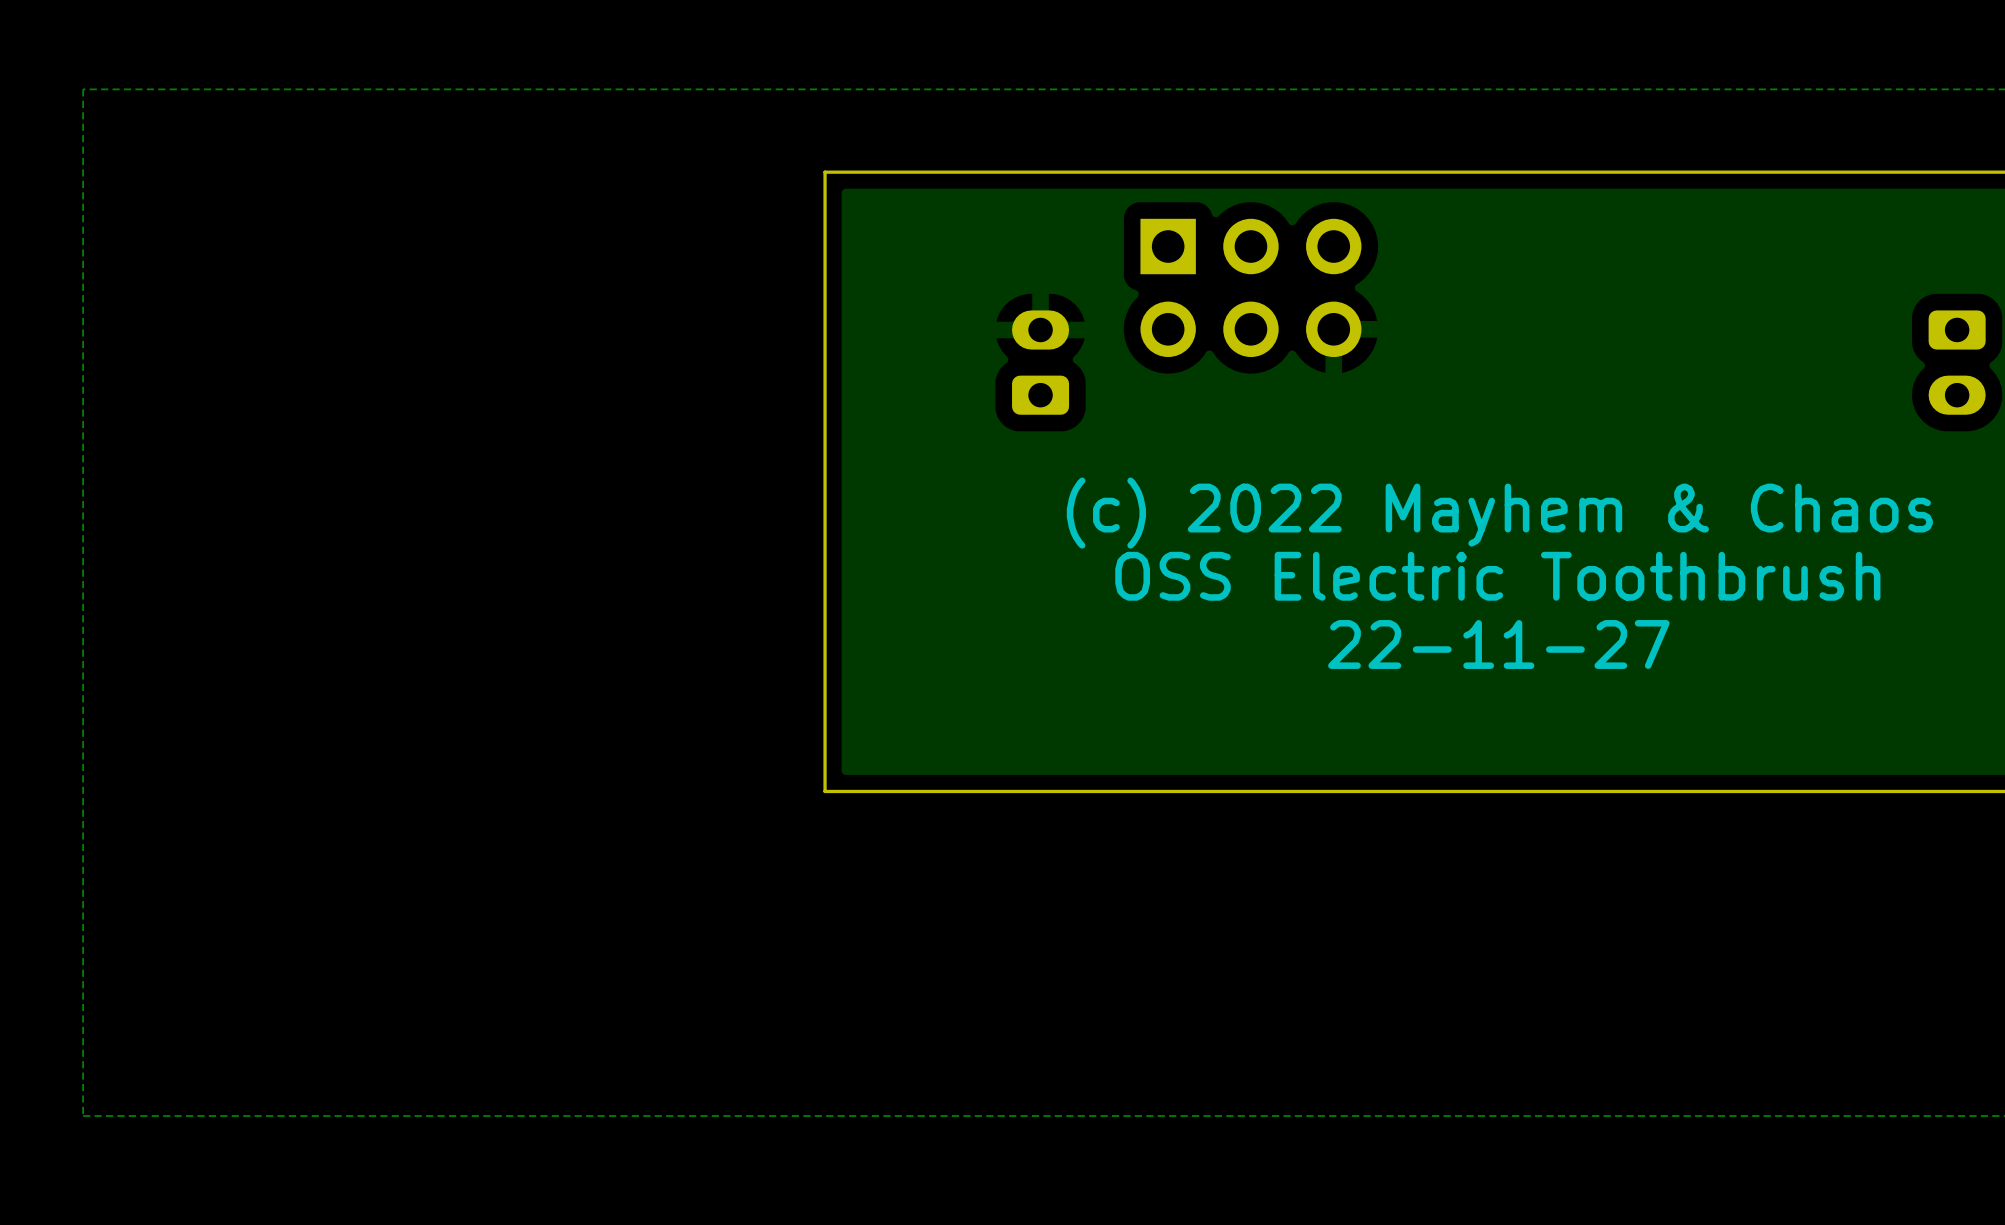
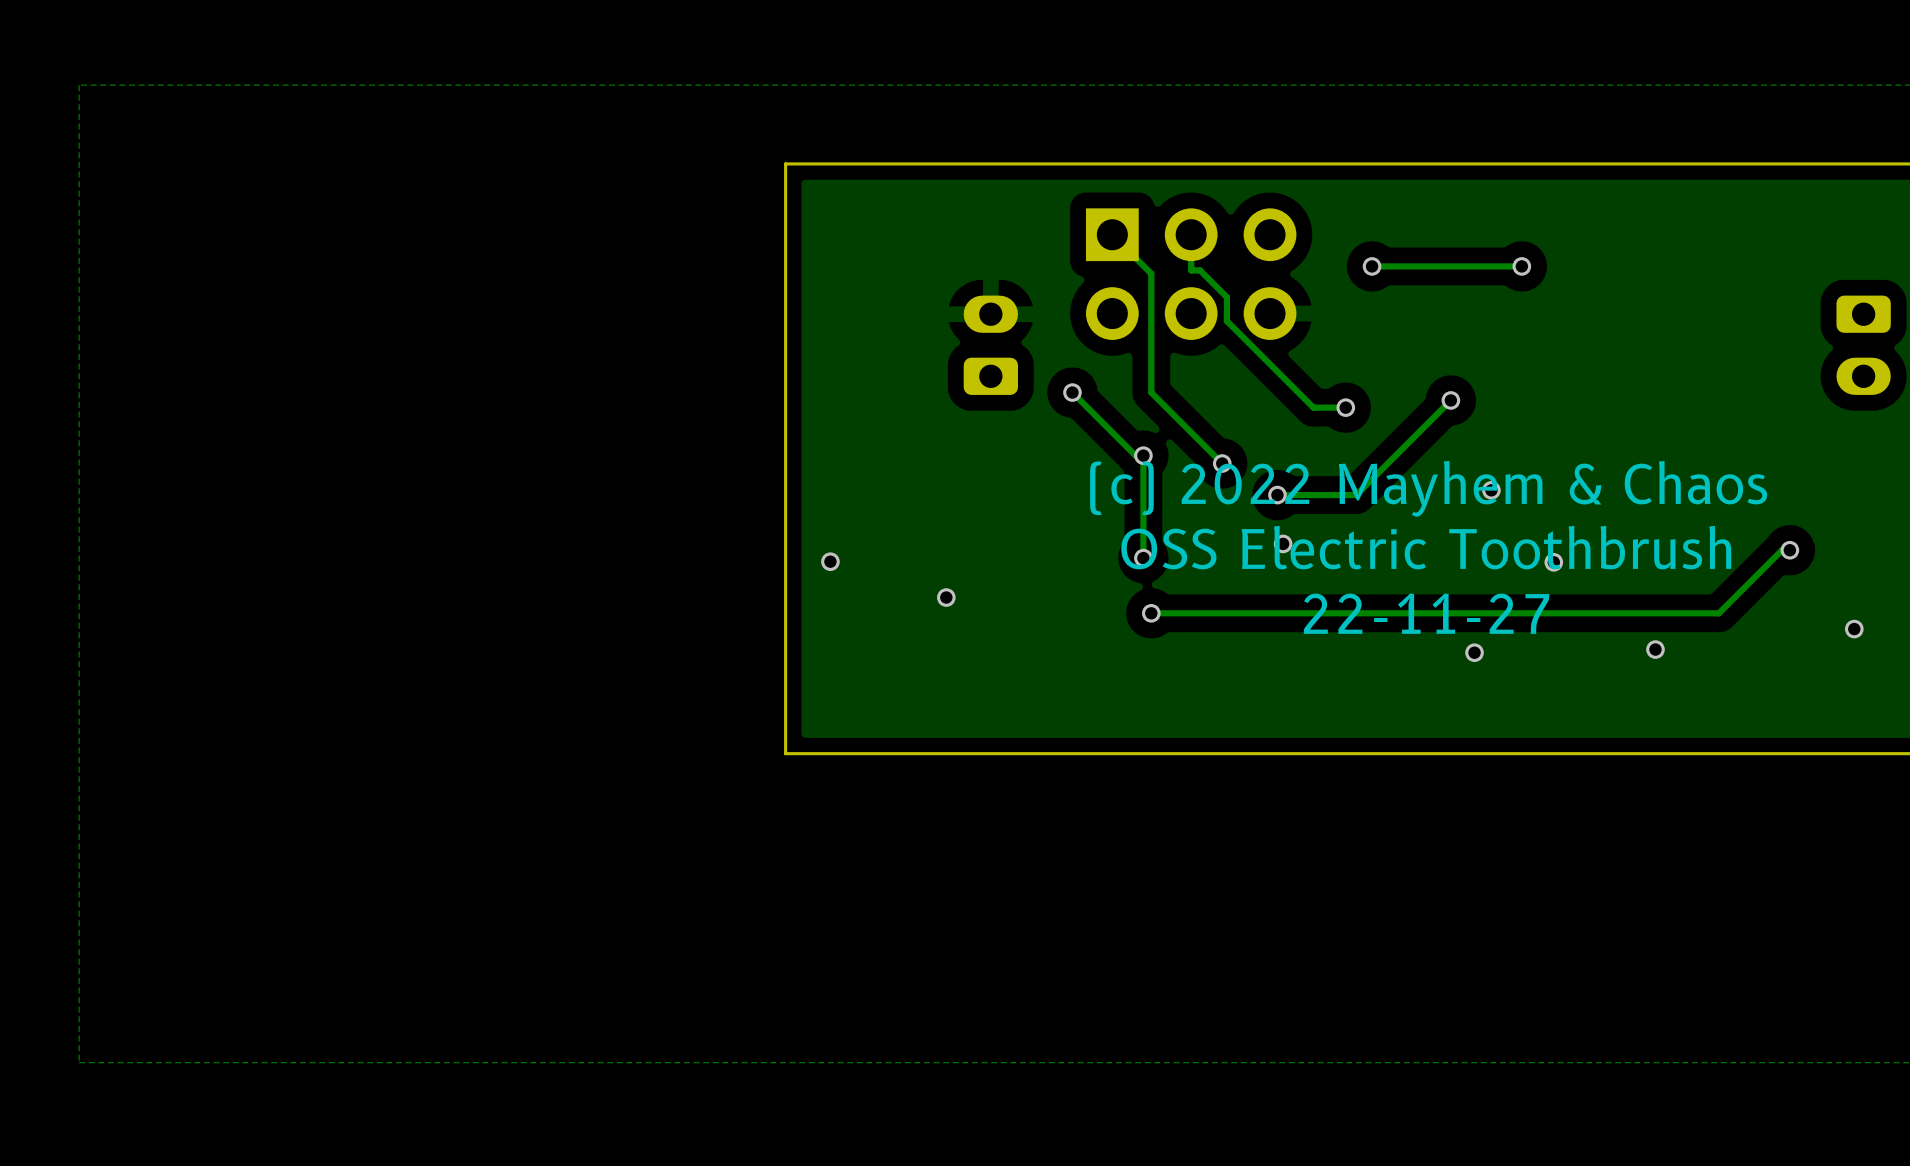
track: none -> (1112, 234) (1151, 273) (1151, 392) (1222, 463)
track: none -> (1191, 234) (1191, 270) (1200, 270) (1226, 297) (1226, 321) (1313, 407) (1345, 407)
via: none -> (1372, 266)
track: none -> (1521, 266) (1372, 266)
via: none -> (1521, 266)
track: none -> (1072, 392) (1135, 455) (1143, 455) (1143, 558)
via: none -> (1072, 392)
track: none -> (1450, 400) (1356, 495) (1277, 495)
via: none -> (1450, 400)
via: none -> (1345, 407)
via: none -> (1143, 455)
via: none -> (1222, 463)
via: none -> (1491, 490)
via: none -> (1277, 495)
via: none -> (1283, 543)
track: none -> (1789, 550) (1782, 550) (1718, 613) (1151, 613)
via: none -> (1789, 550)
via: none -> (1143, 558)
via: none -> (830, 561)
via: none -> (1553, 562)
via: none -> (946, 597)
via: none -> (1151, 613)
via: none -> (1854, 629)
via: none -> (1655, 649)
via: none -> (1474, 652)

